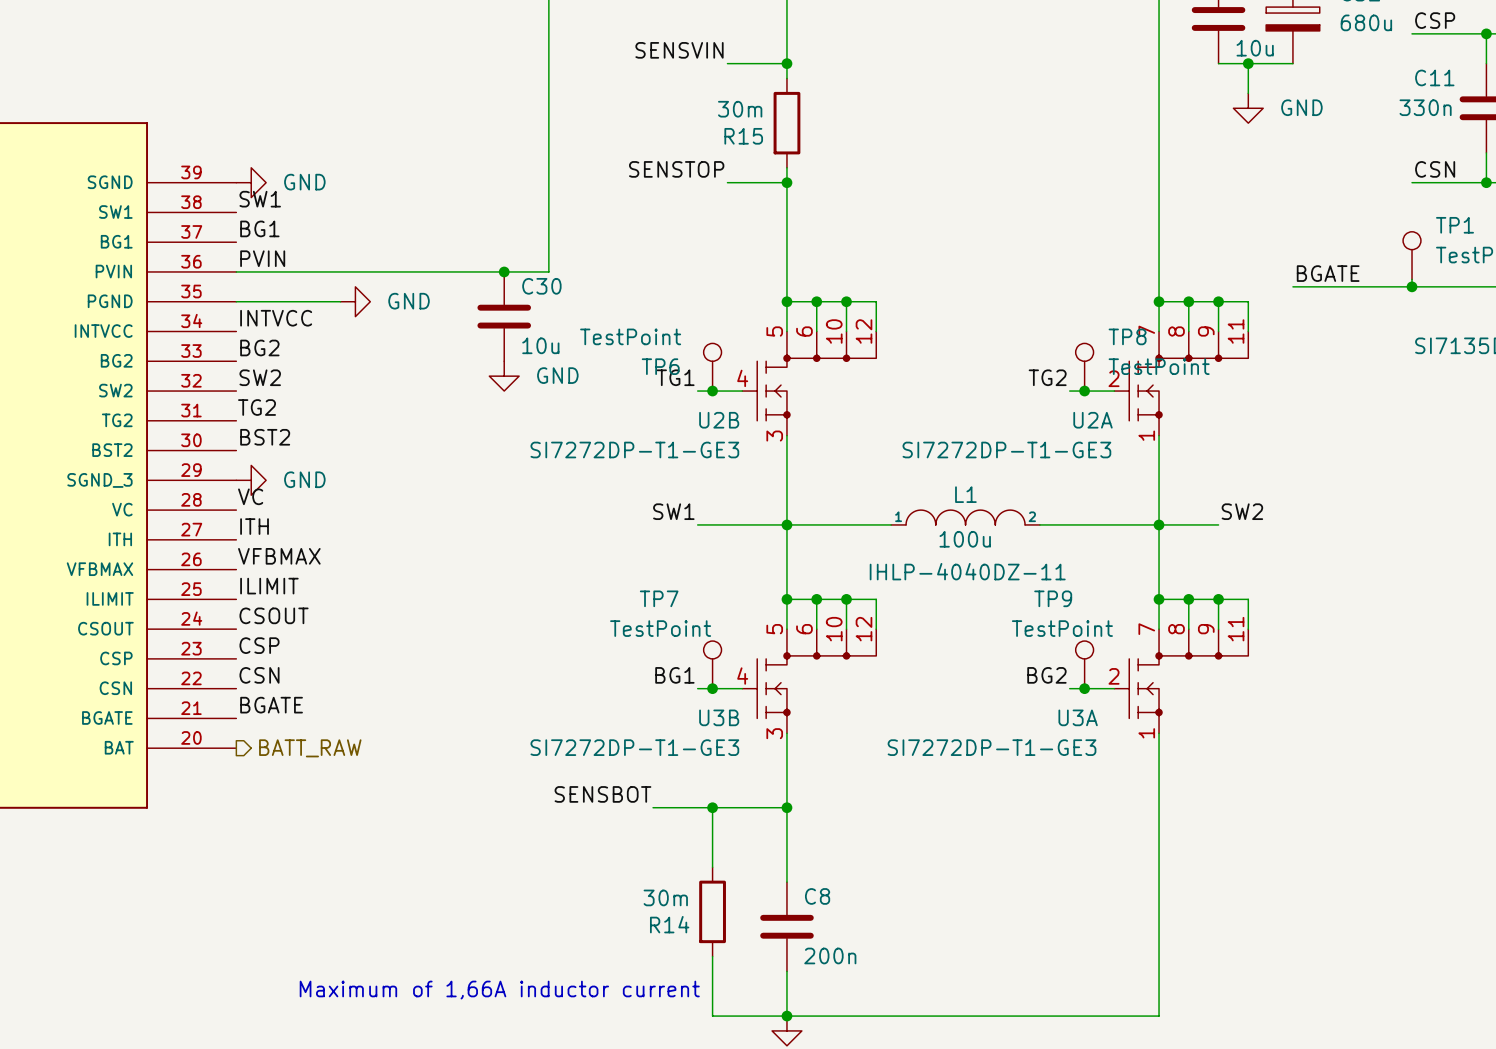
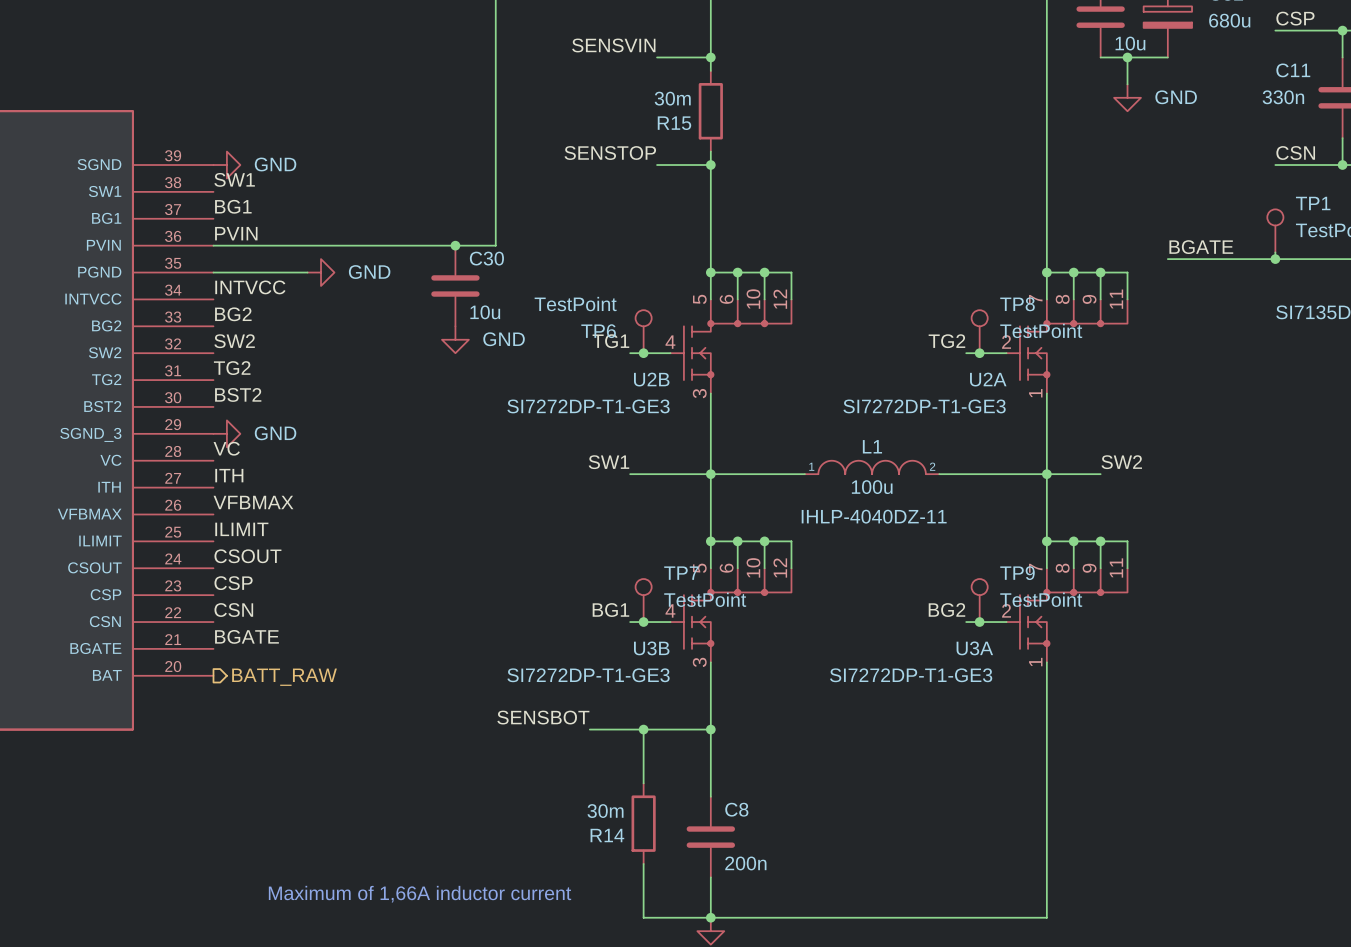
TP7 name position: TP7 (659, 598) -> TP7 (681, 573)
TP9 name position: TP9 (1053, 598) -> TP9 (1017, 573)
TP7 value position: TestPoint (660, 628) -> TestPoint (705, 599)
TP9 value position: TestPoint (1062, 628) -> TestPoint (1041, 599)

